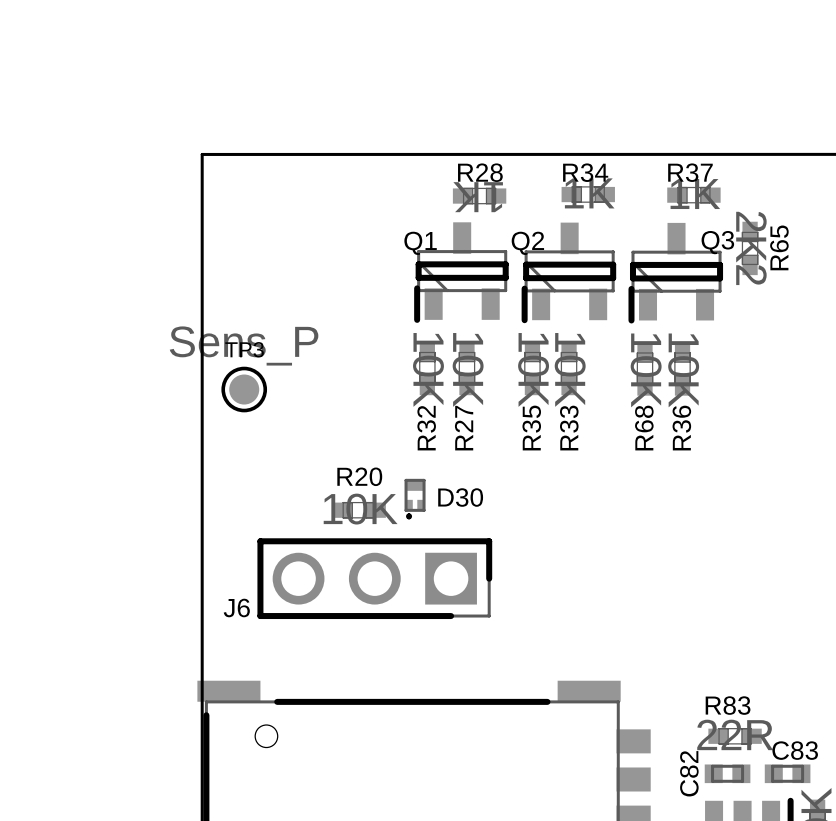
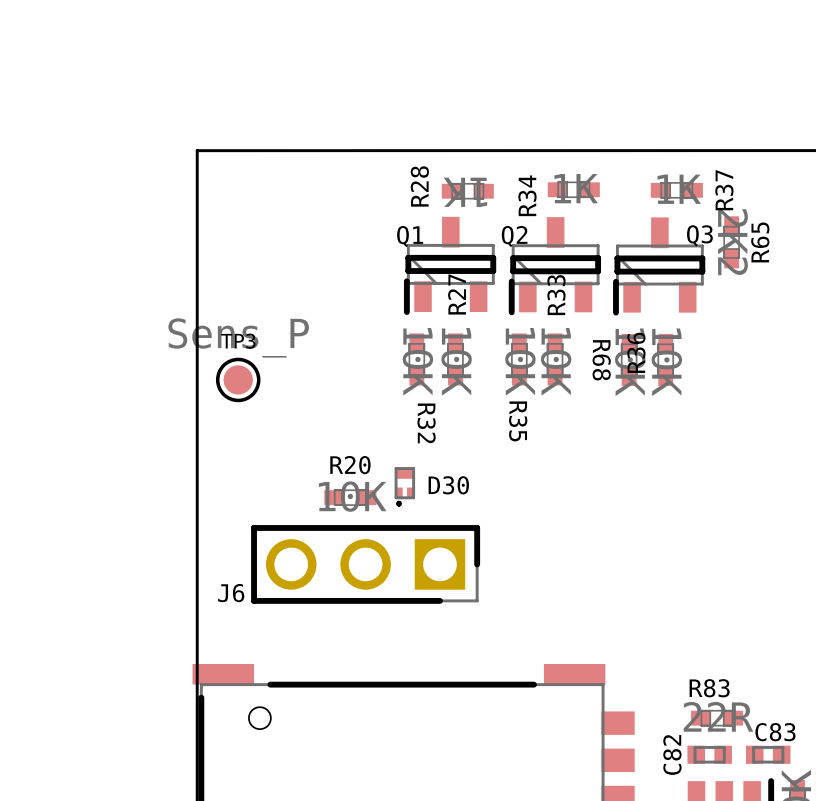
R28 name rotation: 0° (480, 172) -> 90° counterclockwise (419, 186)
R34 name rotation: 0° (585, 172) -> 90° counterclockwise (527, 195)
R37 name rotation: 0° (690, 172) -> 90° counterclockwise (724, 190)
R32 name rotation: 0° (426, 428) -> 180° (426, 423)
R27 name position: R27 (464, 428) -> R27 (457, 294)
R35 name rotation: 0° (531, 428) -> 180° (518, 421)
R33 name position: R33 (569, 428) -> R33 (556, 295)
R68 name rotation: 0° (644, 428) -> 180° (601, 360)
R68 name position: R68 (644, 428) -> R68 (601, 360)
R36 name position: R36 (681, 428) -> R36 (636, 352)

